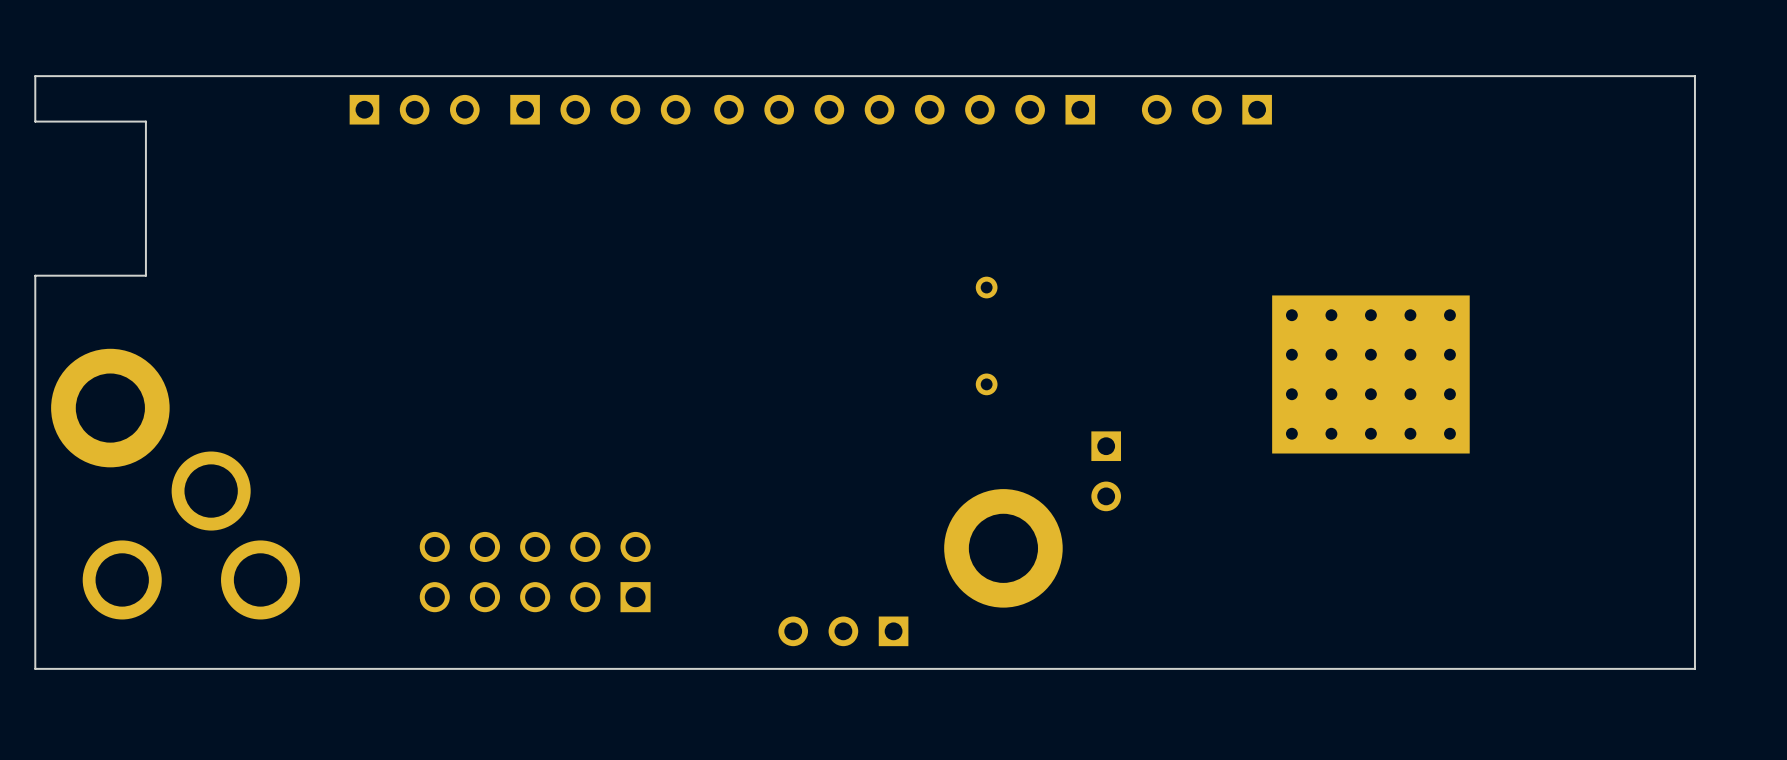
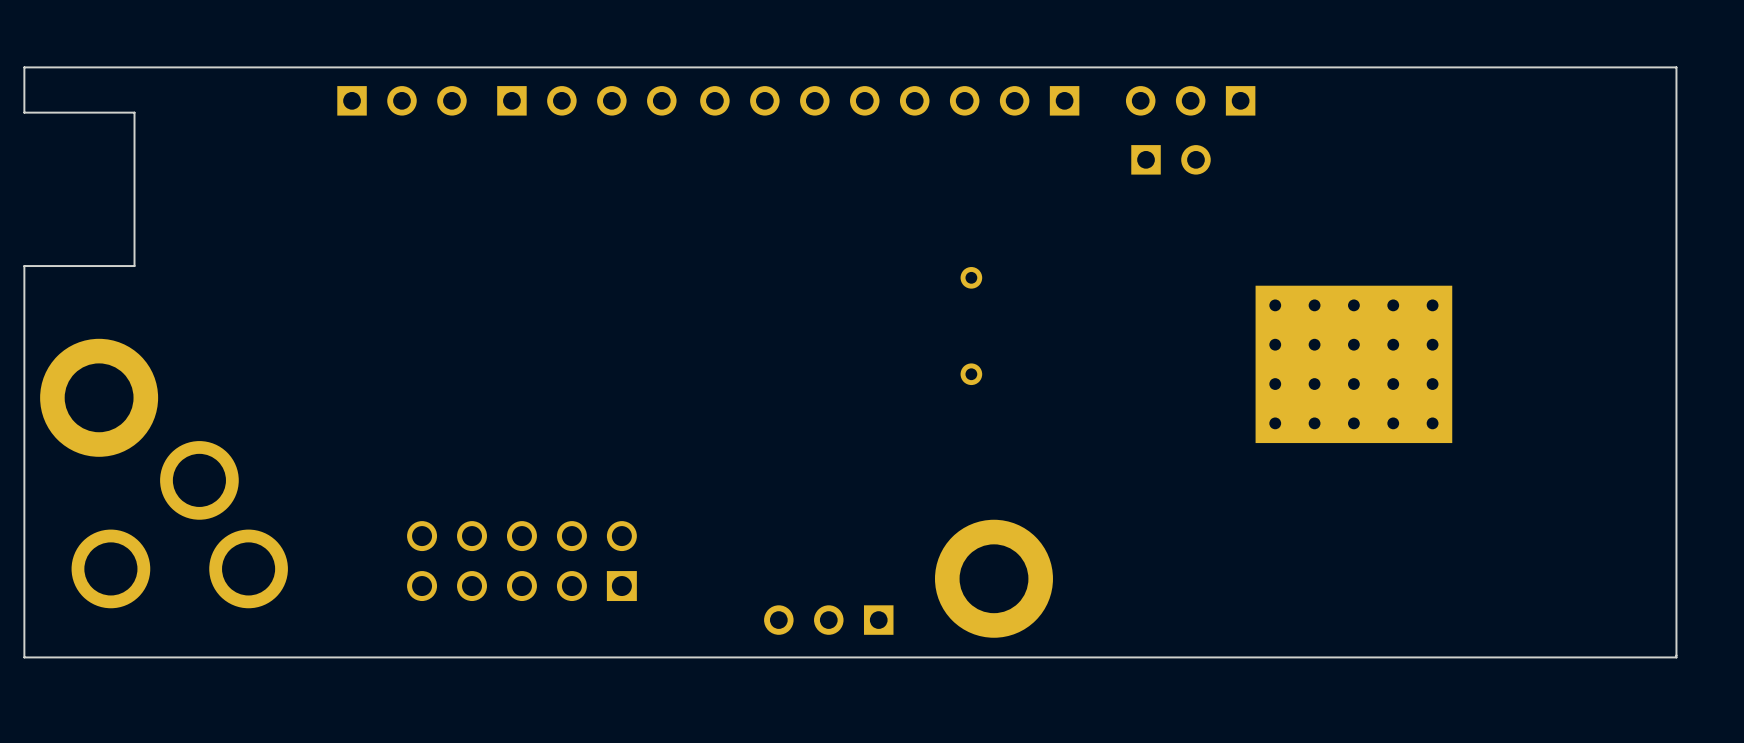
part rotation: 0° (1106, 471) -> 90° counterclockwise (1171, 159)
part position: (1106, 471) -> (1171, 159)
part position: (1003, 548) -> (993, 578)

